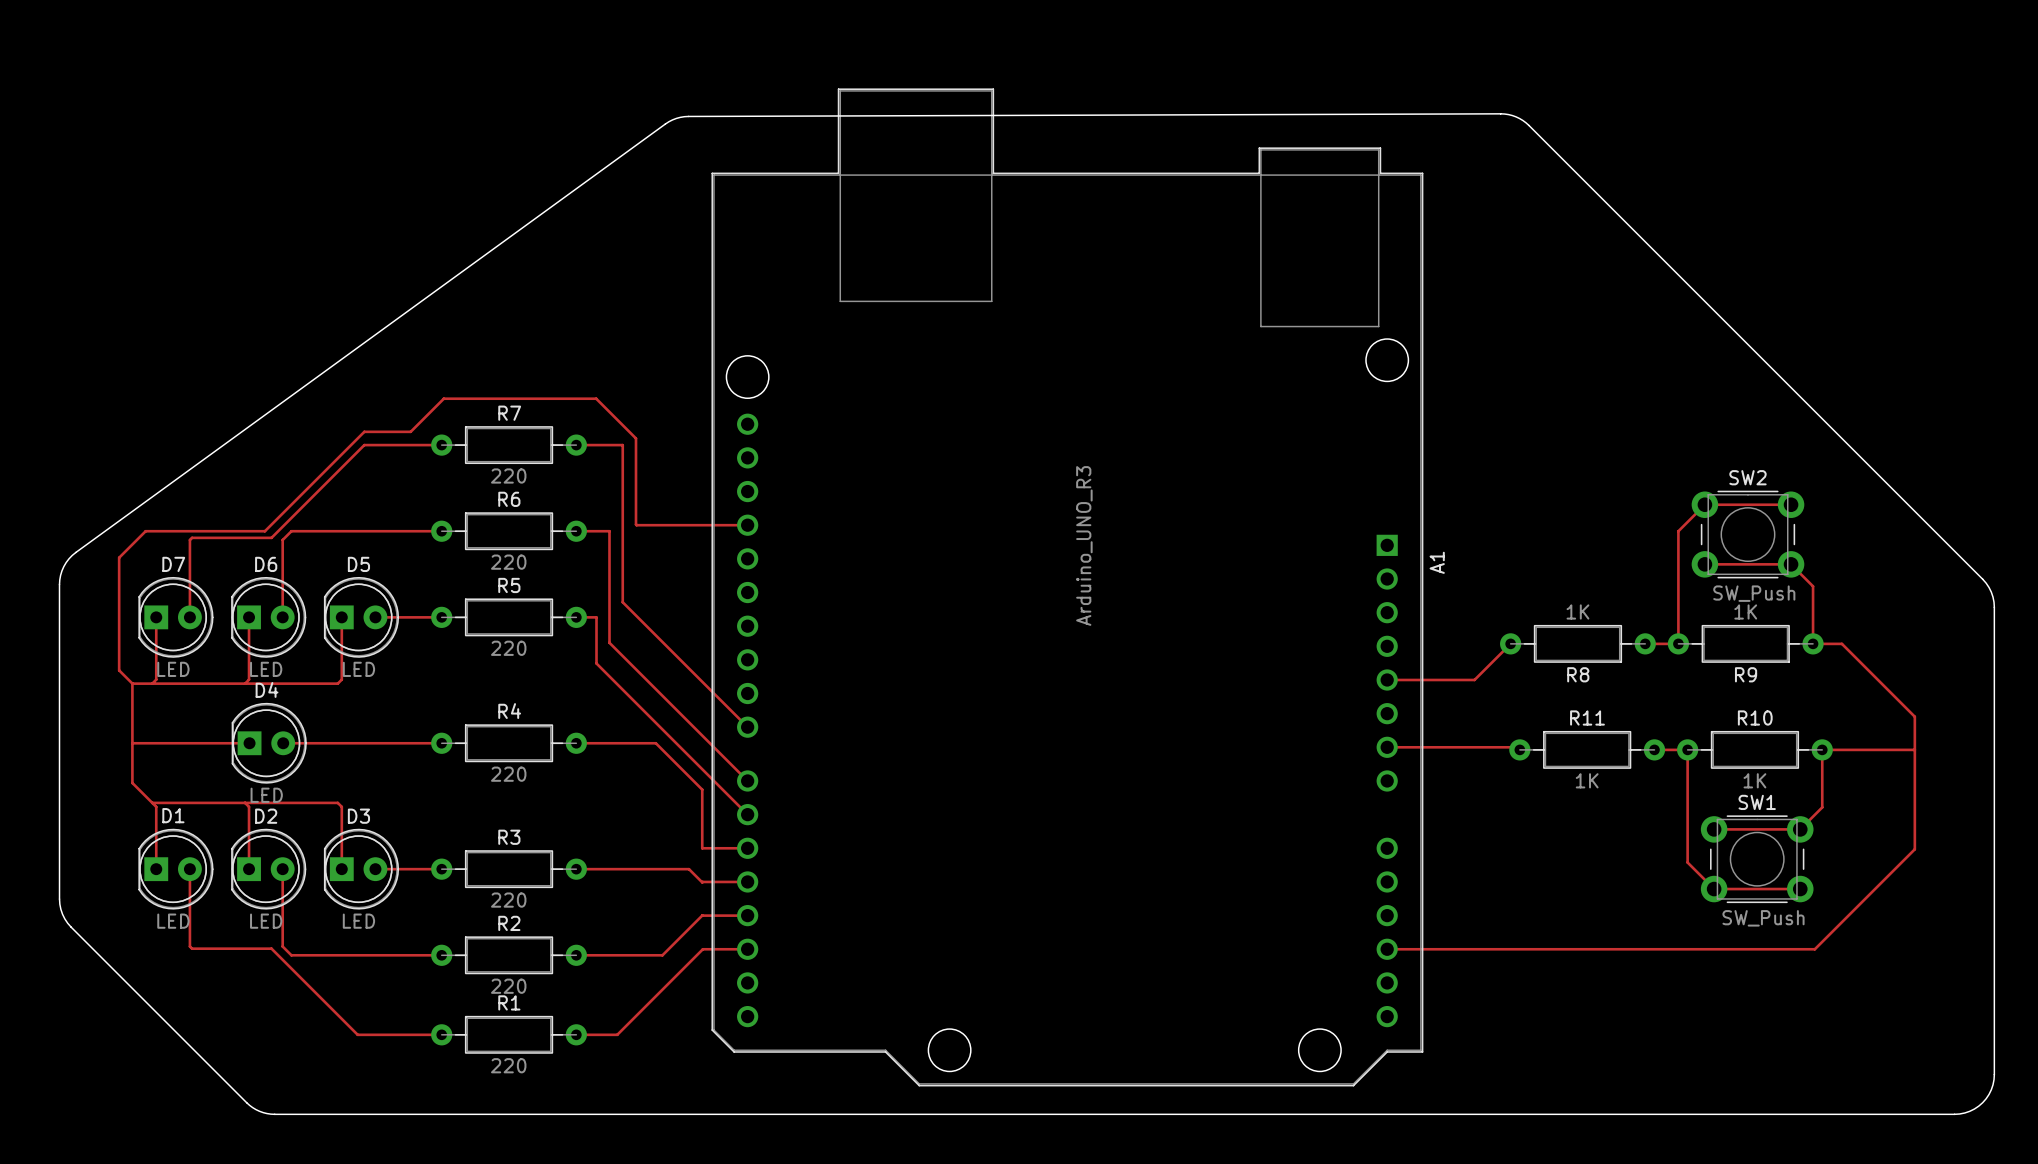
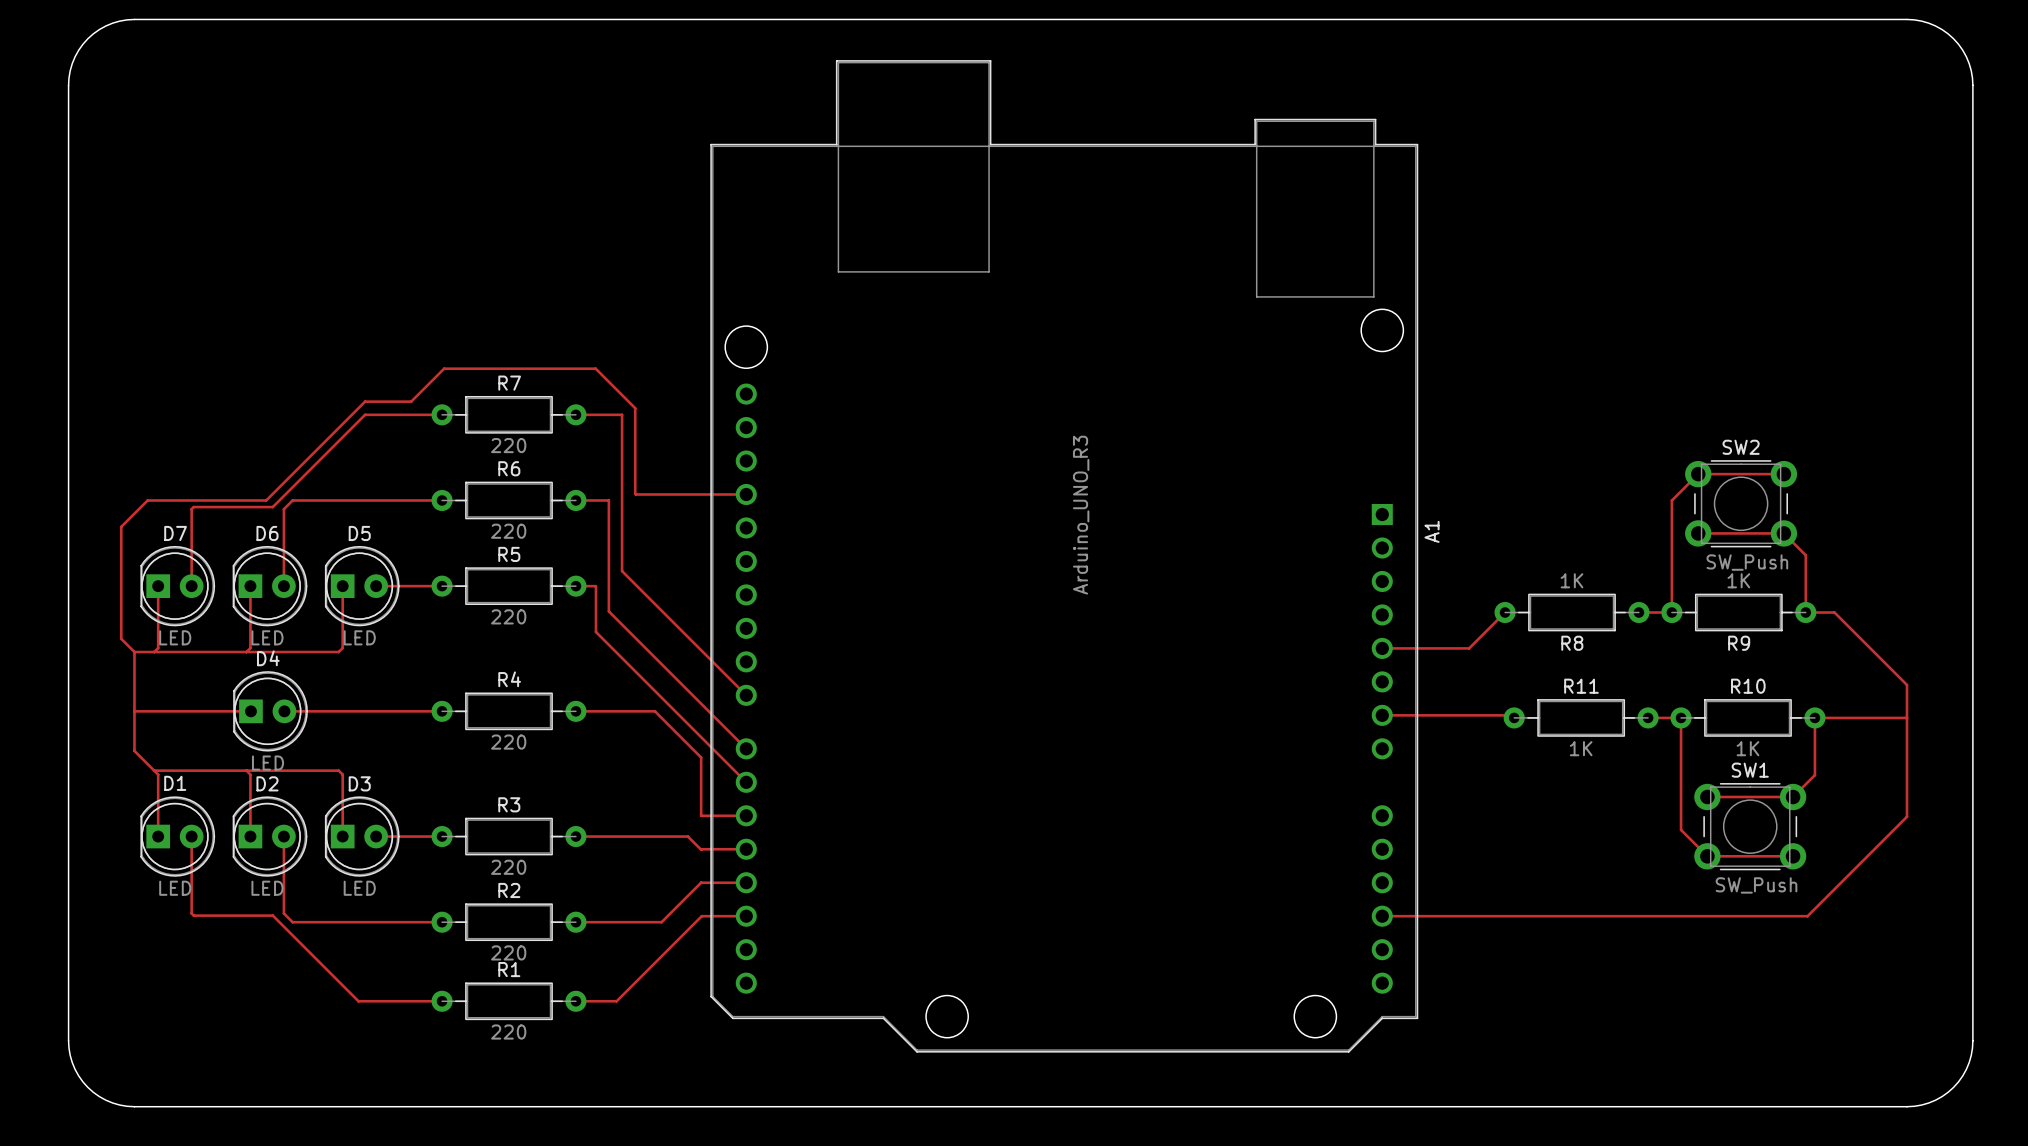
board edge: (1500, 113) (688, 116) (668, 121) (69, 558) (61, 570) (59, 584) (59, 899) (64, 918) (246, 1102) (259, 1111) (270, 1114) (1954, 1114) (1974, 1109) (1989, 1094) (1994, 1074) (1994, 607) (1991, 592) (1982, 579) (1528, 125) (1516, 116) (1500, 113) -> (134, 19) (119, 21) (105, 25) (87, 38) (75, 56) (70, 70) (68, 85) (68, 1040) (72, 1062) (78, 1075) (87, 1087) (99, 1096) (112, 1103) (134, 1106) (1907, 1106) (1928, 1103) (1942, 1096) (1953, 1087) (1962, 1075) (1969, 1062) (1972, 1040) (1972, 85) (1971, 70) (1966, 56) (1953, 38) (1942, 29) (1928, 23) (1907, 19) (134, 19)

